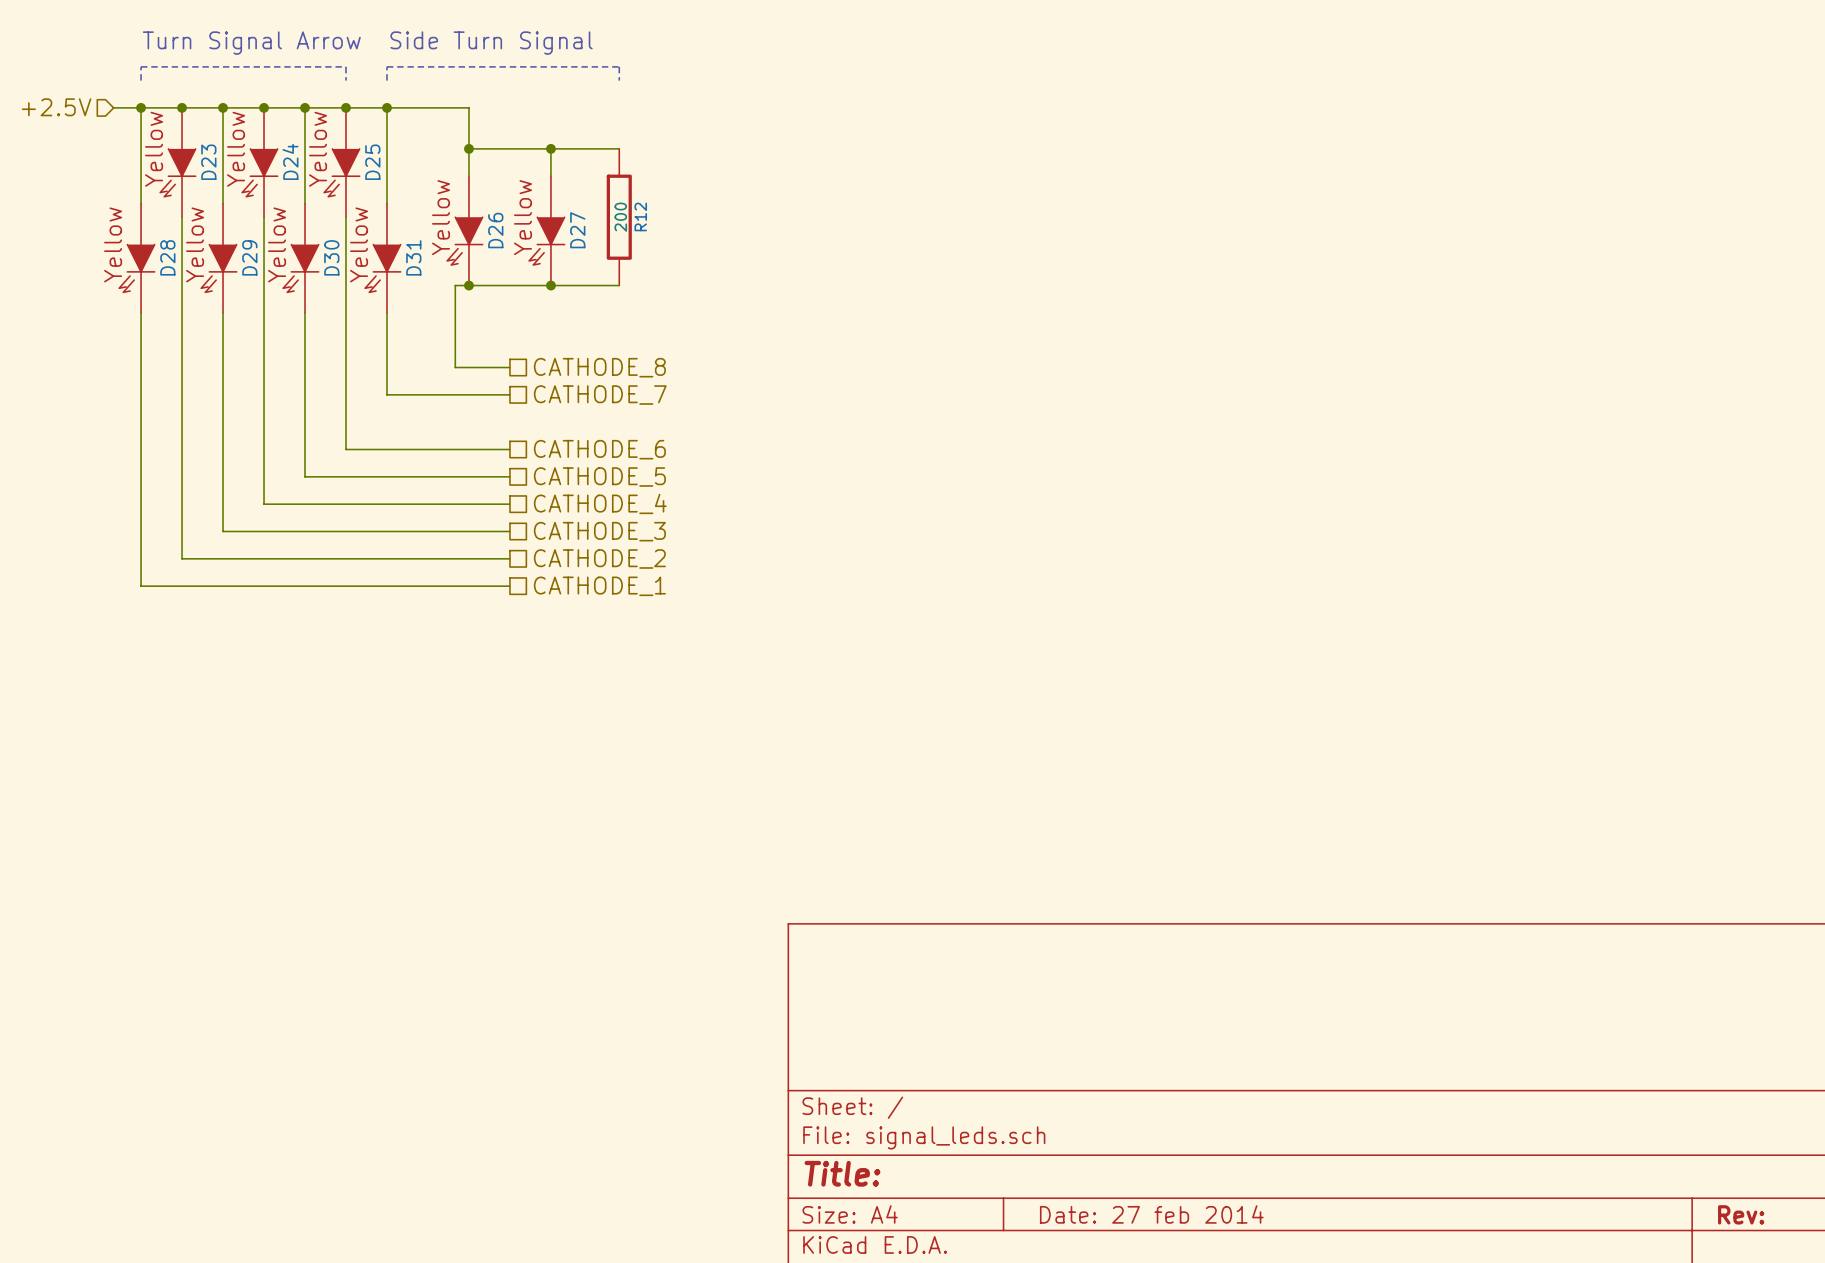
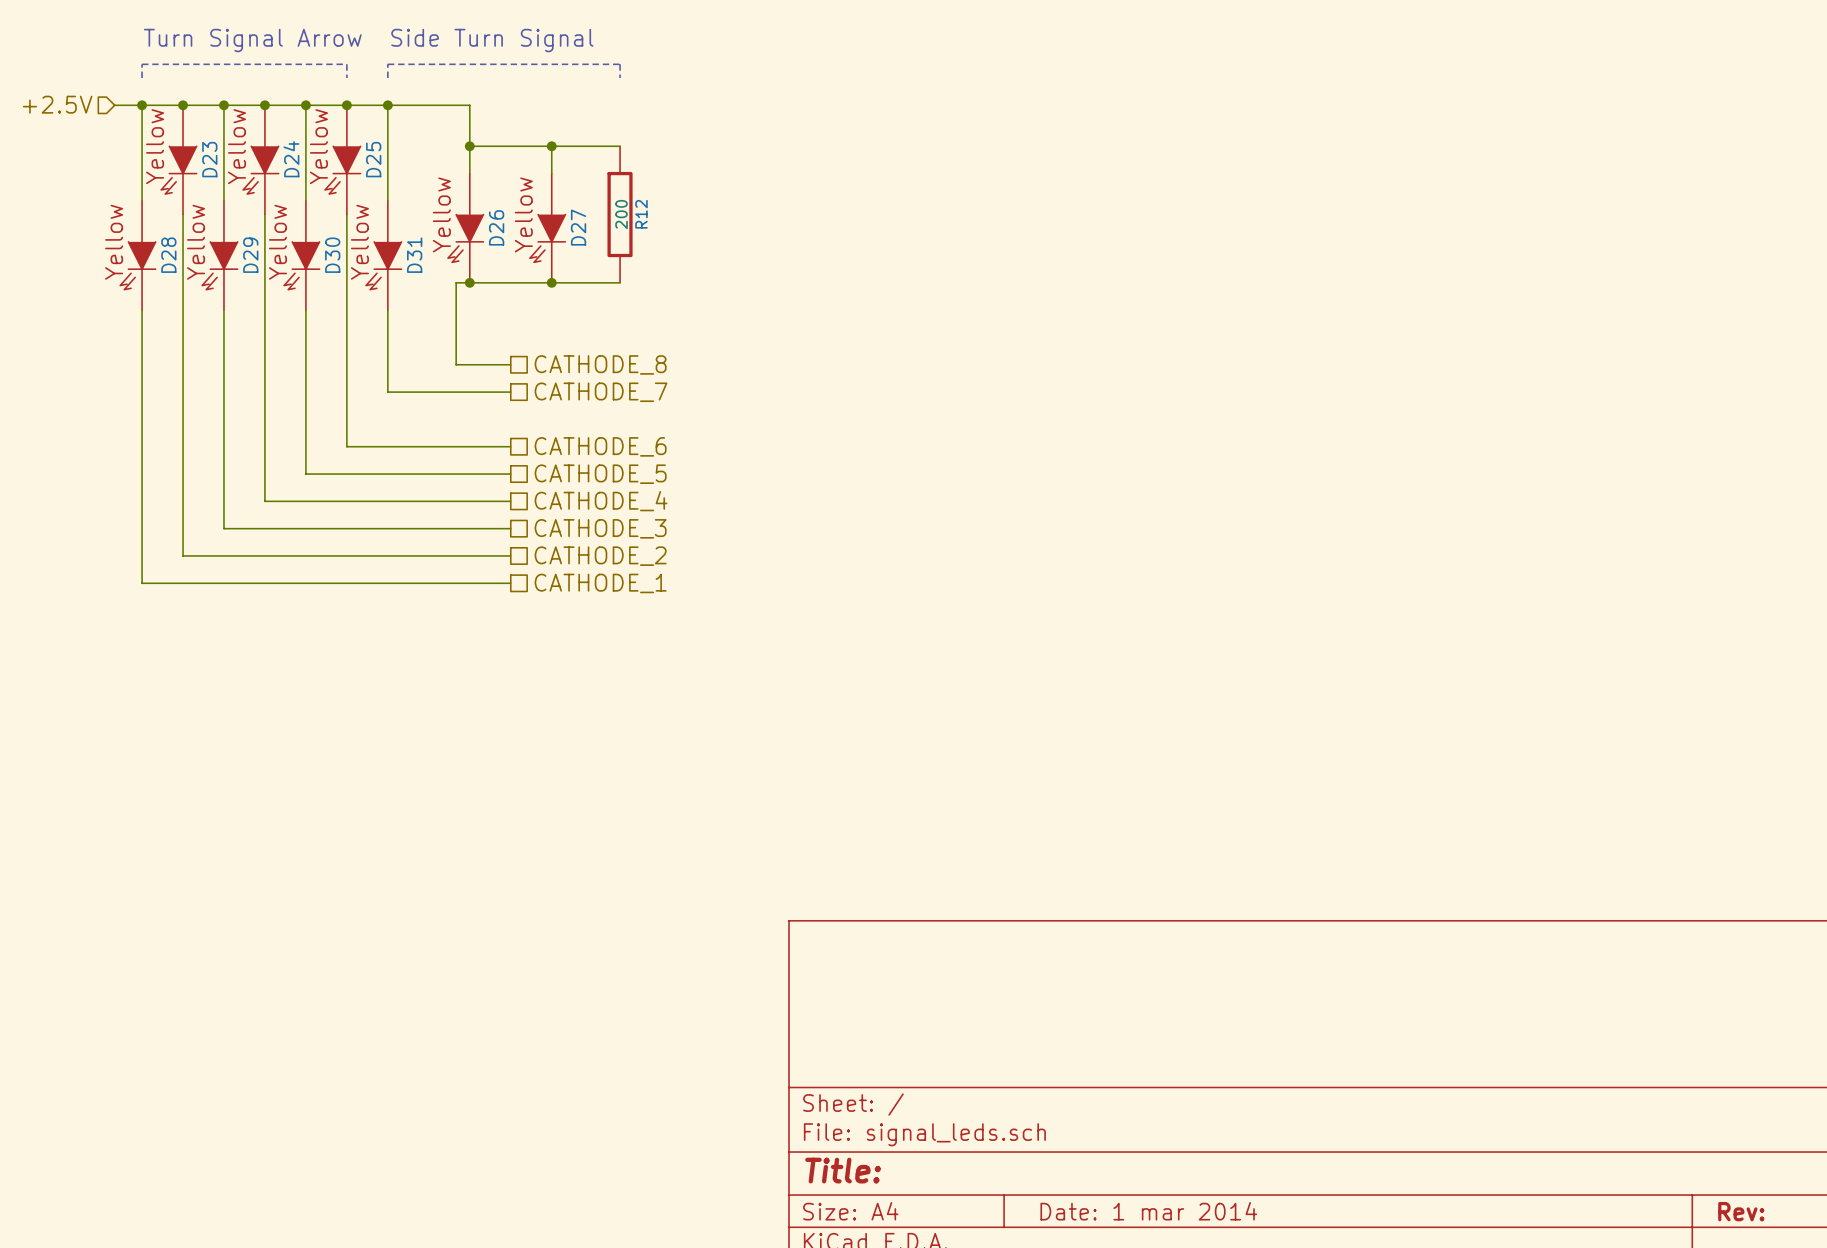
title block: Date: 27 feb 2014 (1151, 1214) -> Date: 1 mar 2014 (1148, 1211)

